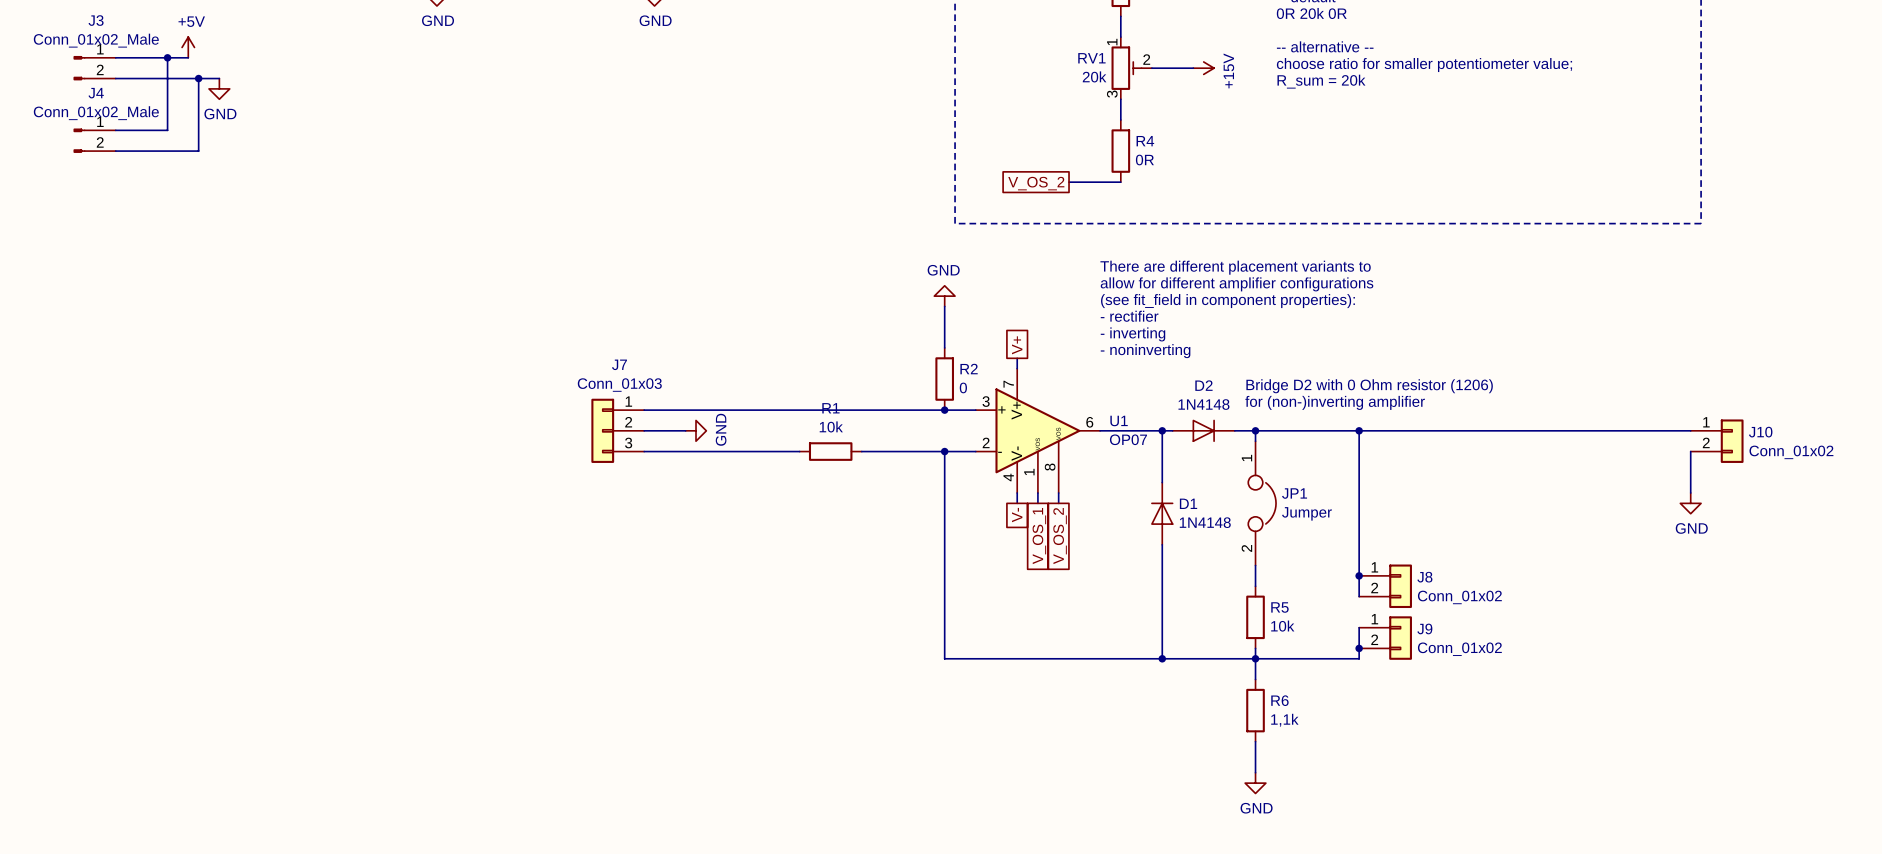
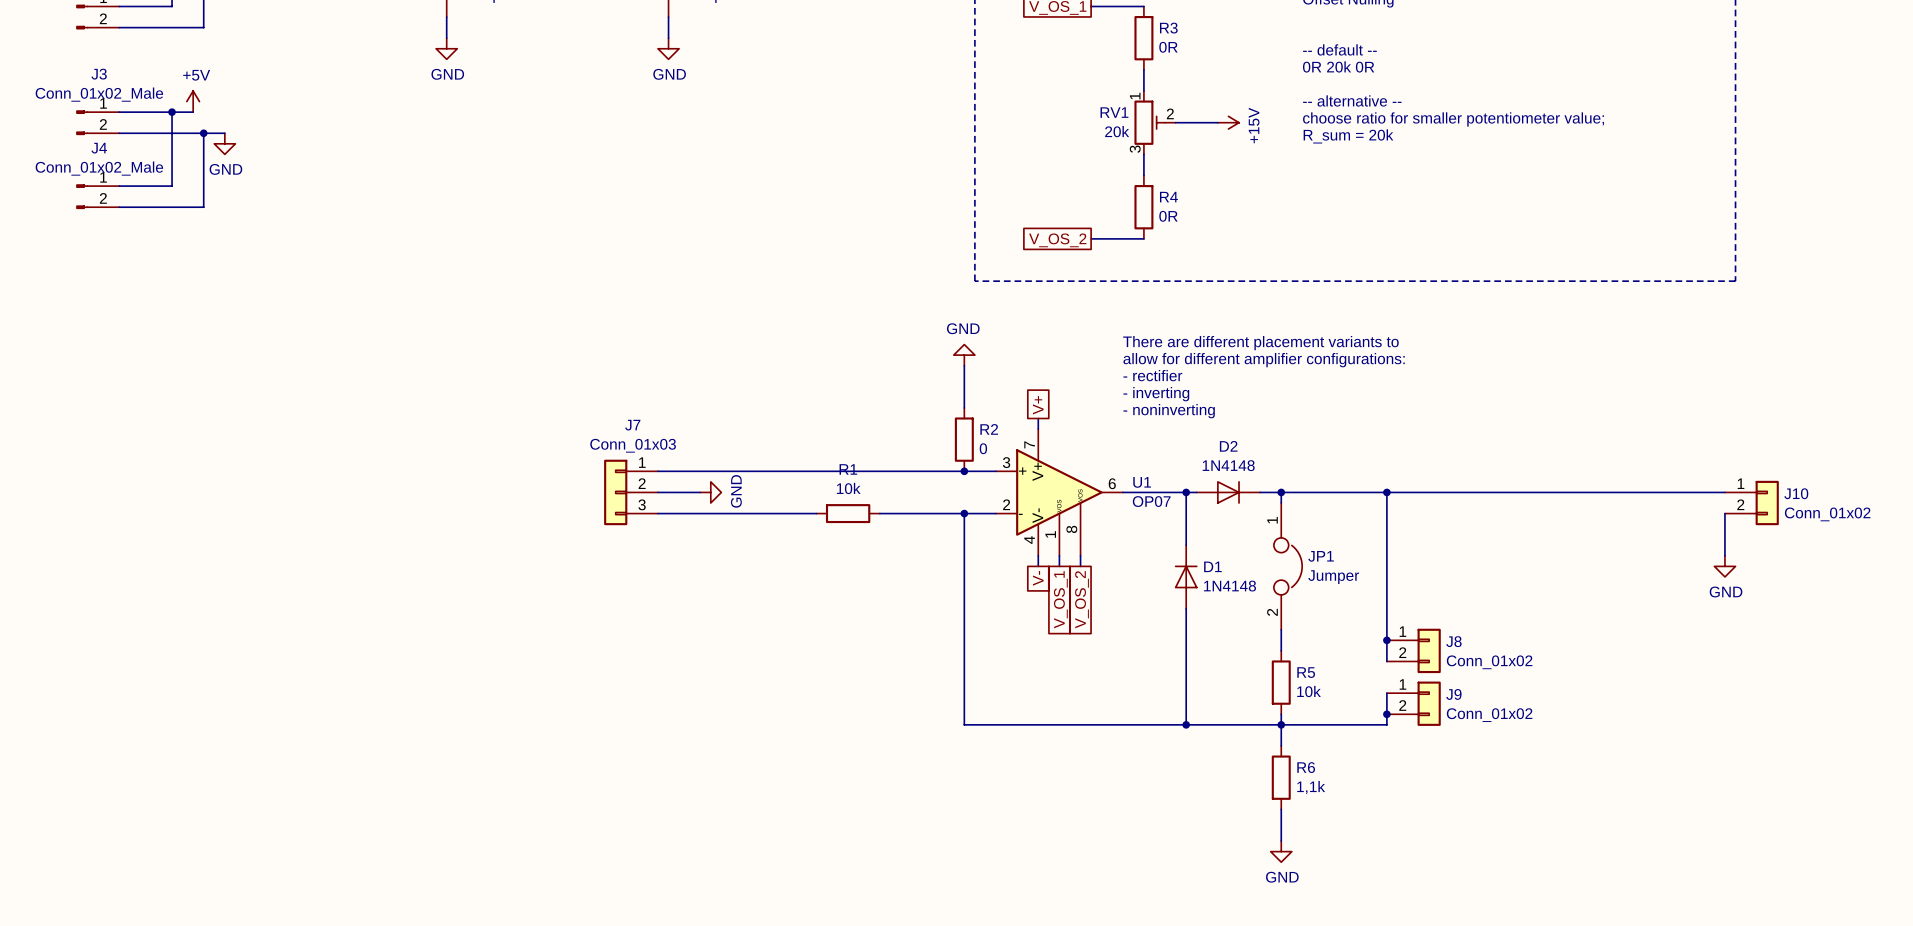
text: There are different placement variants to (1235, 267) -> none
text: allow for different amplifier configurations (1237, 284) -> There are different placement variants to (1260, 343)
text: (see fit_field in component properties): (1227, 301) -> allow for different amplifier configurations: (1264, 360)
text: Bridge D2 with 0 Ohm resistor (1206) (1369, 386) -> none
text: for (non-)inverting amplifier (1335, 402) -> none

